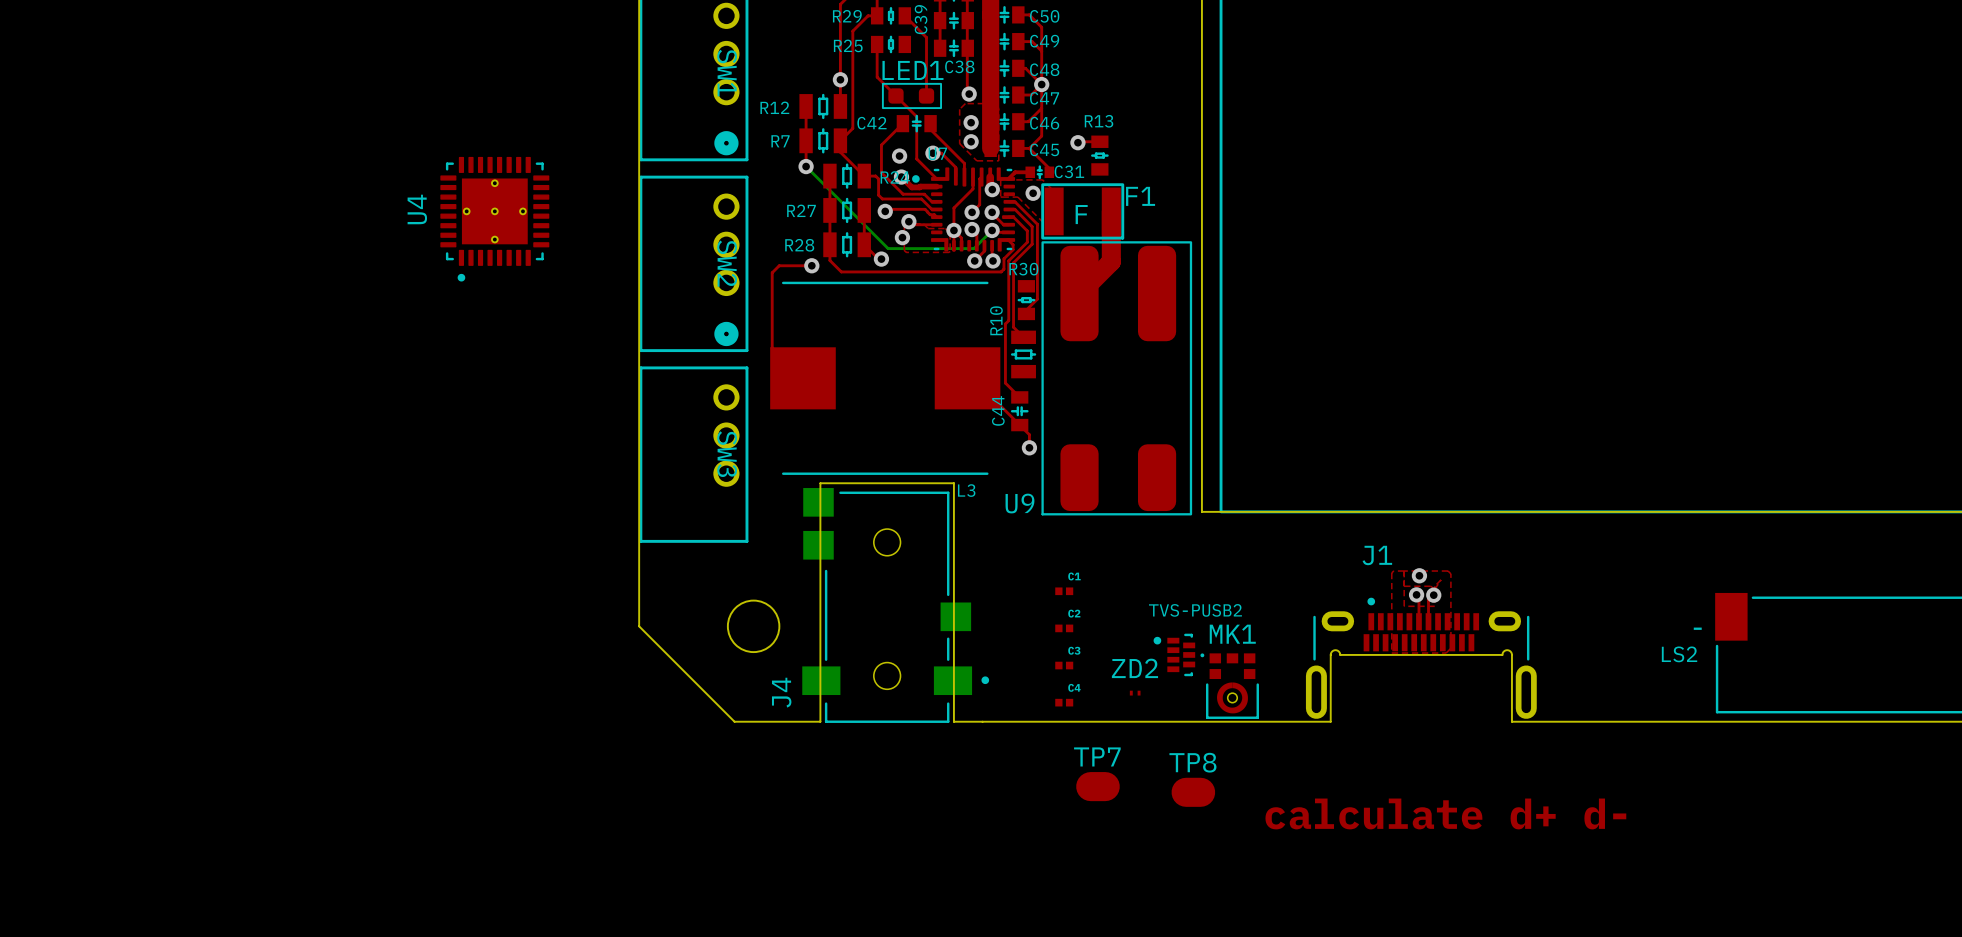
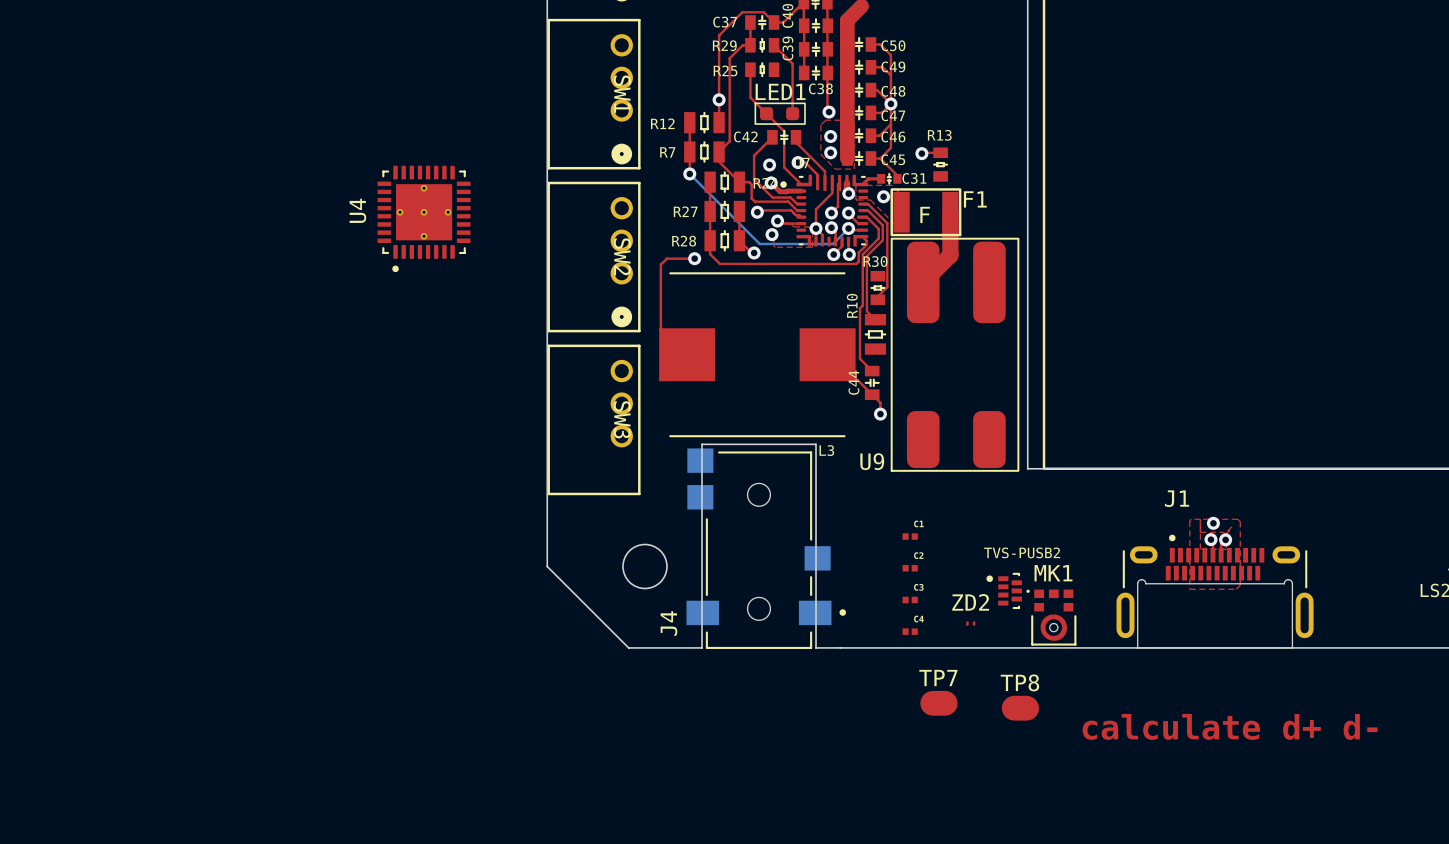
J1 footprint: [1305, 597, 1537, 719] -> [1116, 534, 1314, 649]
board edge: (1330, 721) (1330, 654) (1335, 650) (1340, 654) (1502, 654) (1504, 651) (1509, 650) (1511, 654) (1511, 721) -> (1137, 647) (1292, 647)

